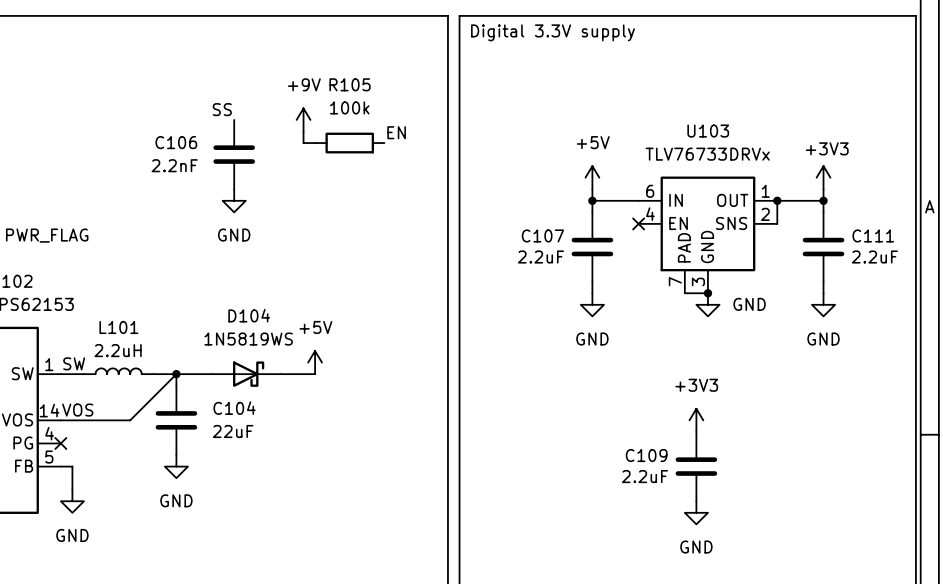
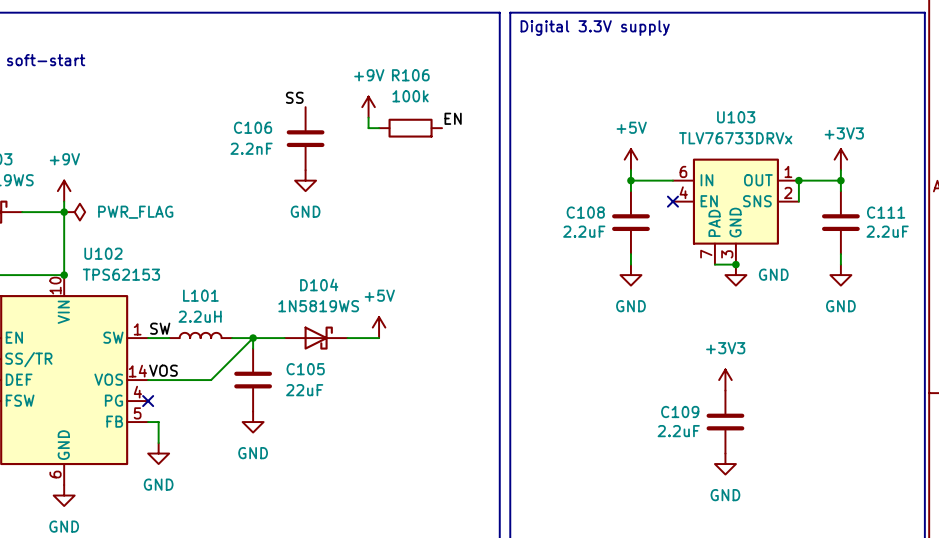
R105 name: R105 (350, 84) -> R106 (410, 75)
C107 name: C107 (542, 235) -> C108 (585, 212)
C104 name: C104 (234, 408) -> C105 (305, 369)

